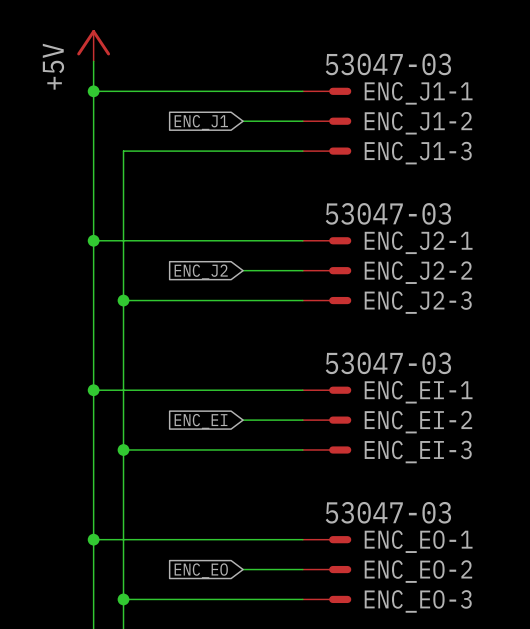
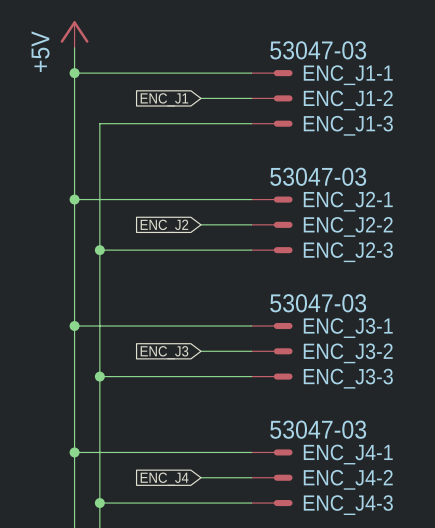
ENC_EI-1 name: ENC_EI-1 (418, 392) -> ENC_J3-1 (348, 328)
global label: ENC_EI (201, 421) -> ENC_J3 (164, 352)
ENC_EI-2 name: ENC_EI-2 (418, 422) -> ENC_J3-2 (348, 353)
ENC_EI-3 name: ENC_EI-3 (418, 452) -> ENC_J3-3 (348, 378)
ENC_EO-1 name: ENC_EO-1 (418, 541) -> ENC_J4-1 (348, 454)
global label: ENC_EO (201, 570) -> ENC_J4 (164, 479)
ENC_EO-2 name: ENC_EO-2 (418, 571) -> ENC_J4-2 (348, 479)
ENC_EO-3 name: ENC_EO-3 (418, 601) -> ENC_J4-3 (348, 505)

